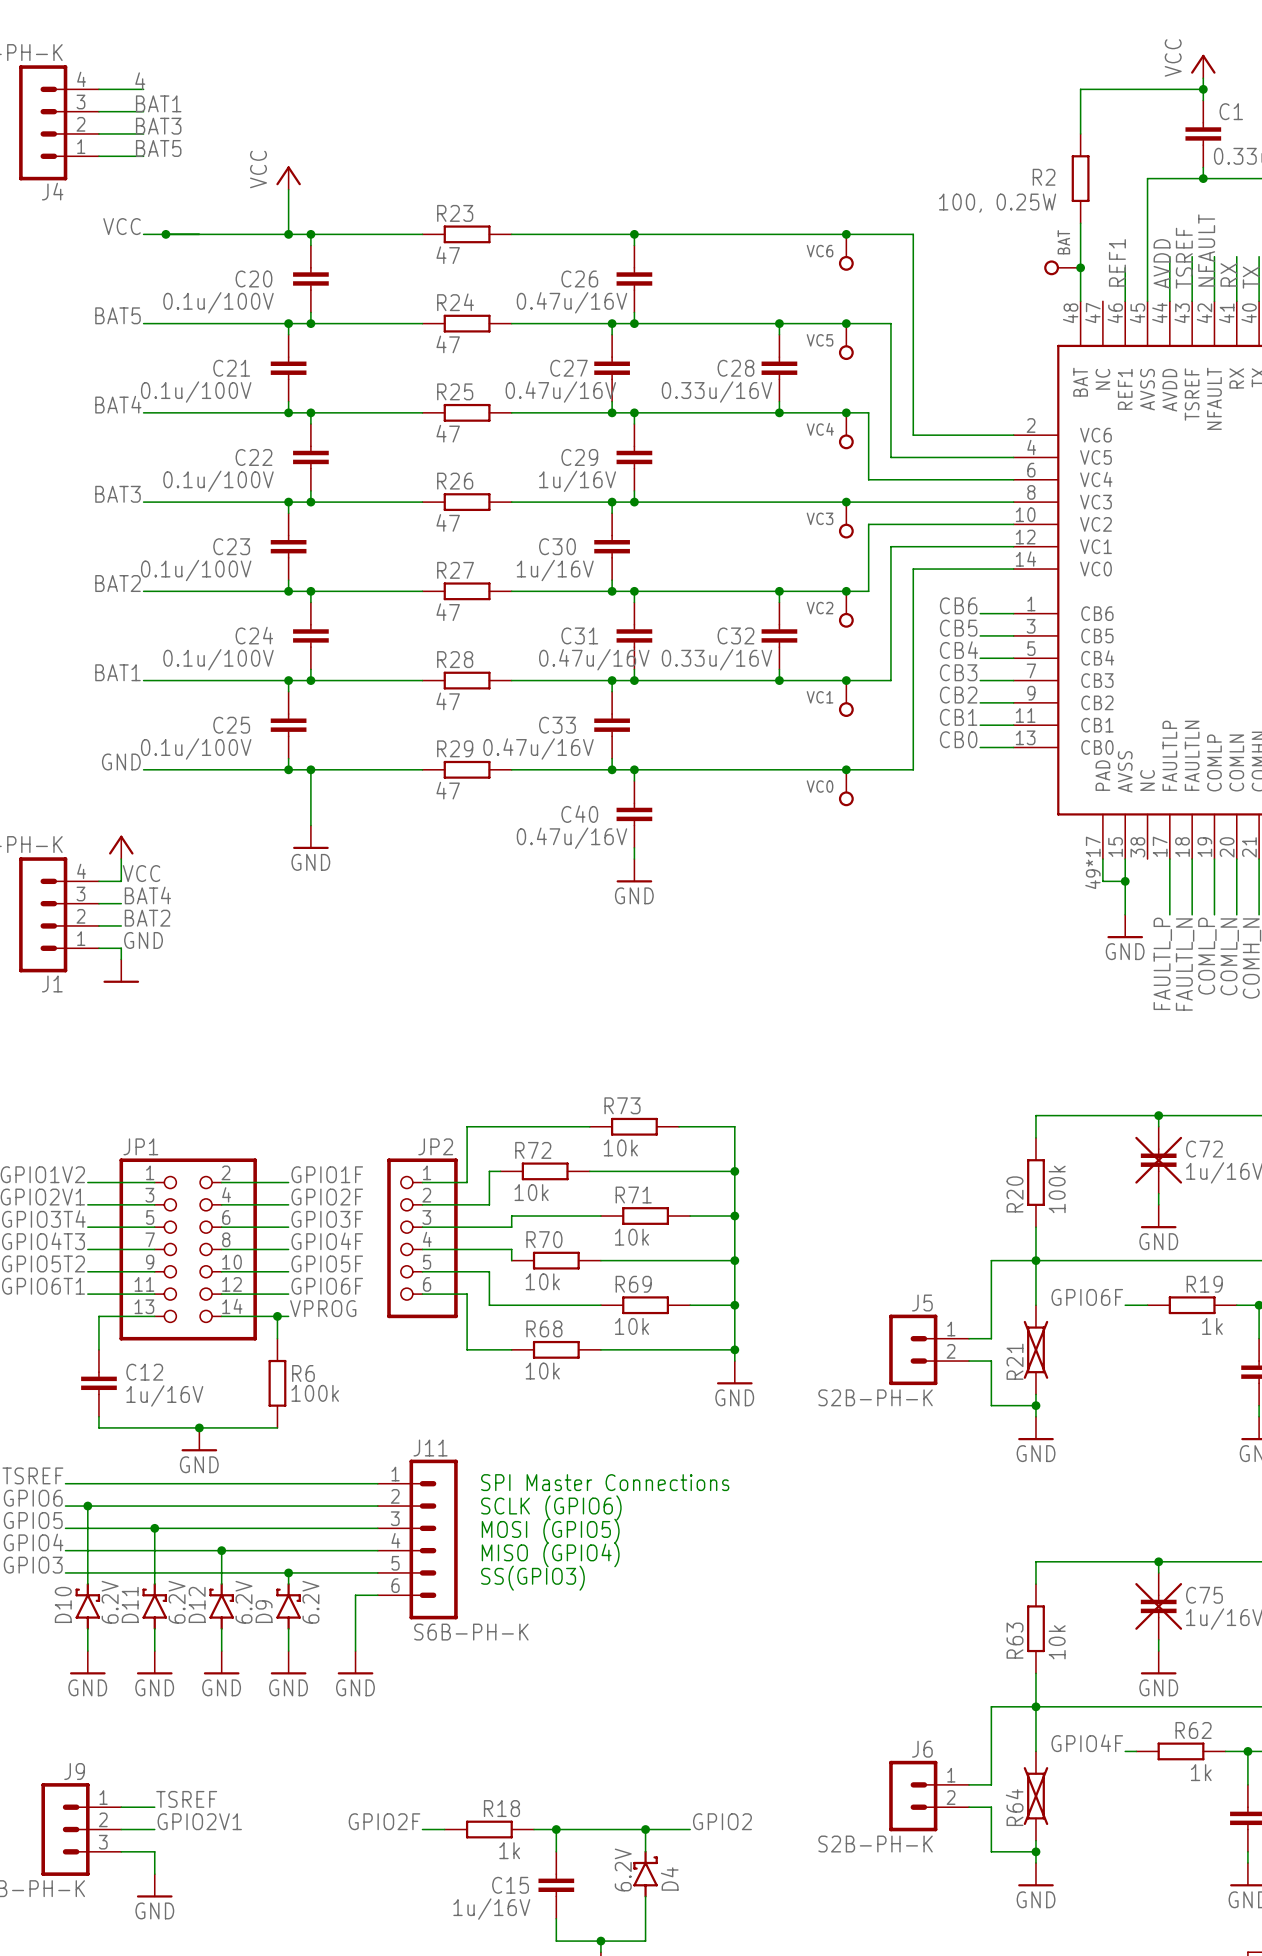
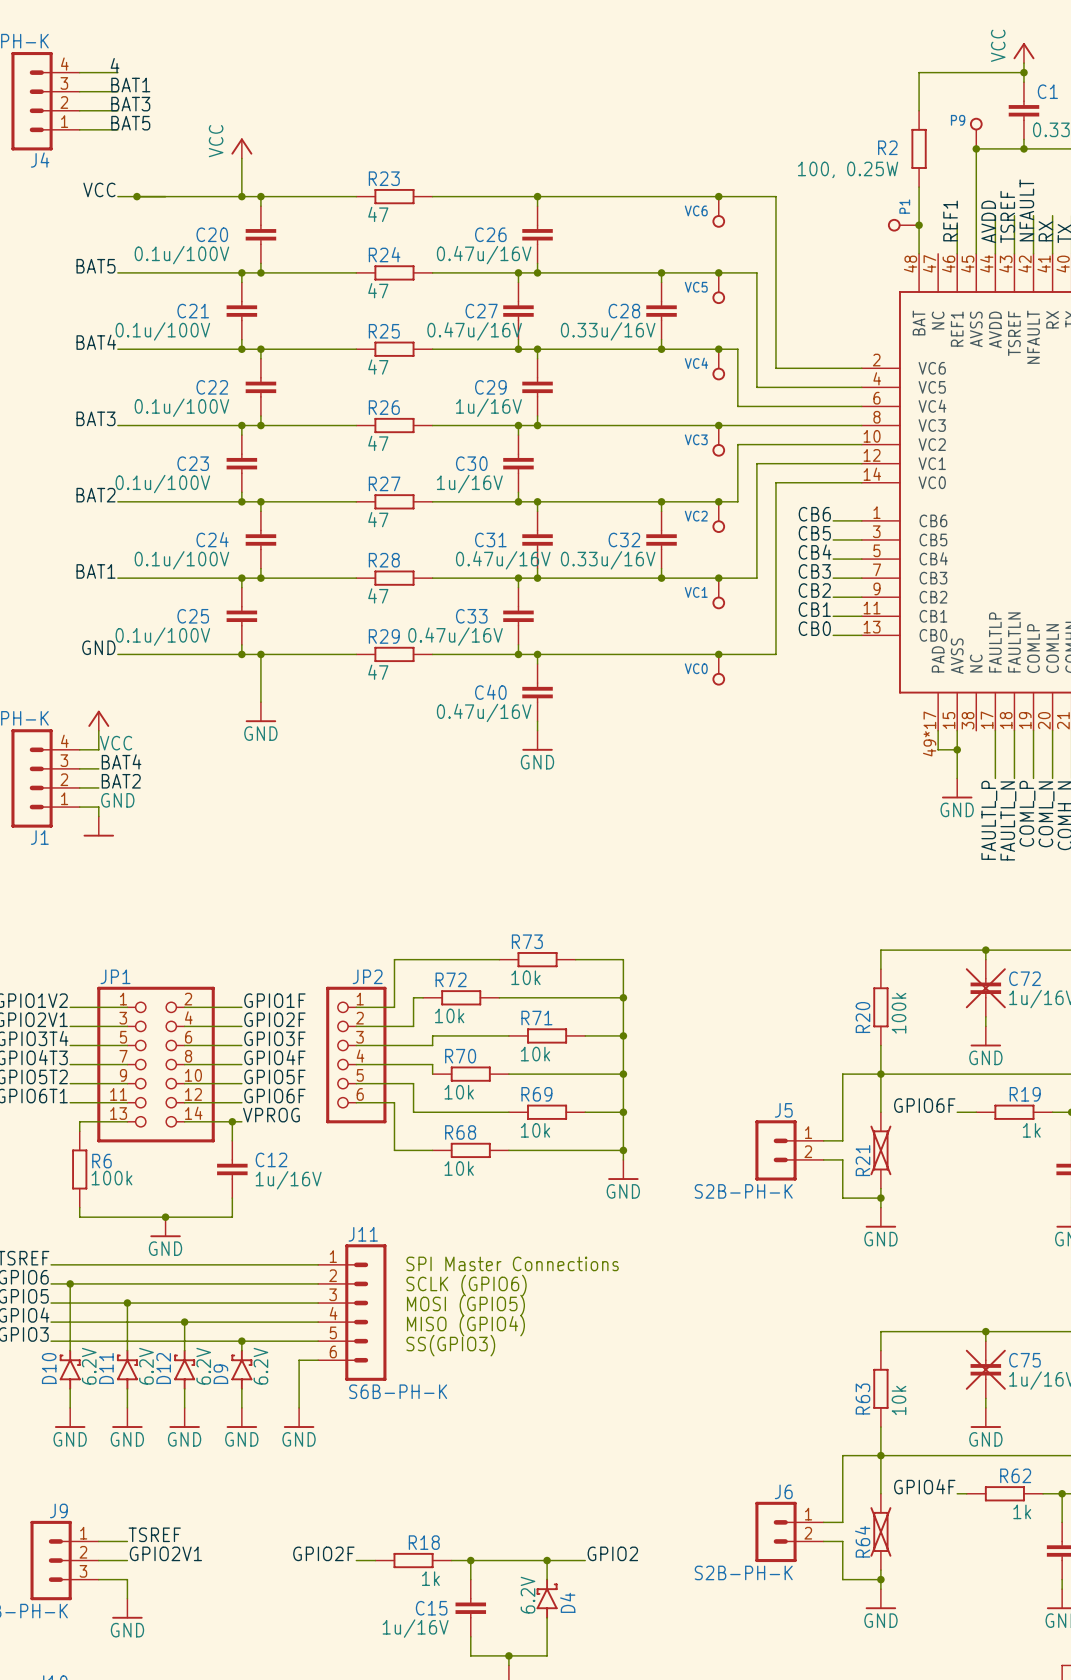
P9: none -> (976, 133)
junction: none -> (976, 148)
BAT name: BAT (1063, 242) -> P1 (904, 206)
C12 position: (98, 1383) -> (232, 1169)
R6 position: (277, 1383) -> (79, 1169)

